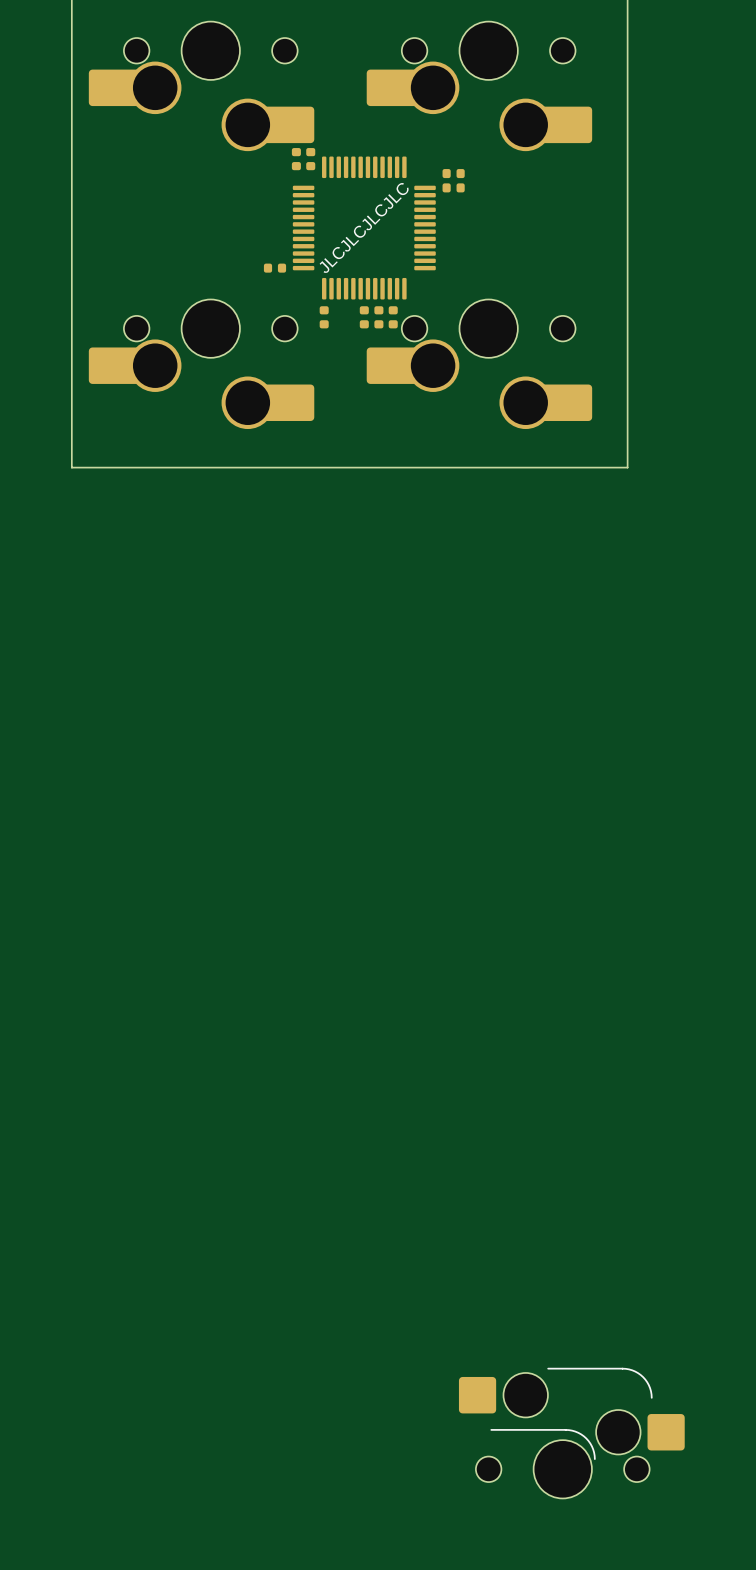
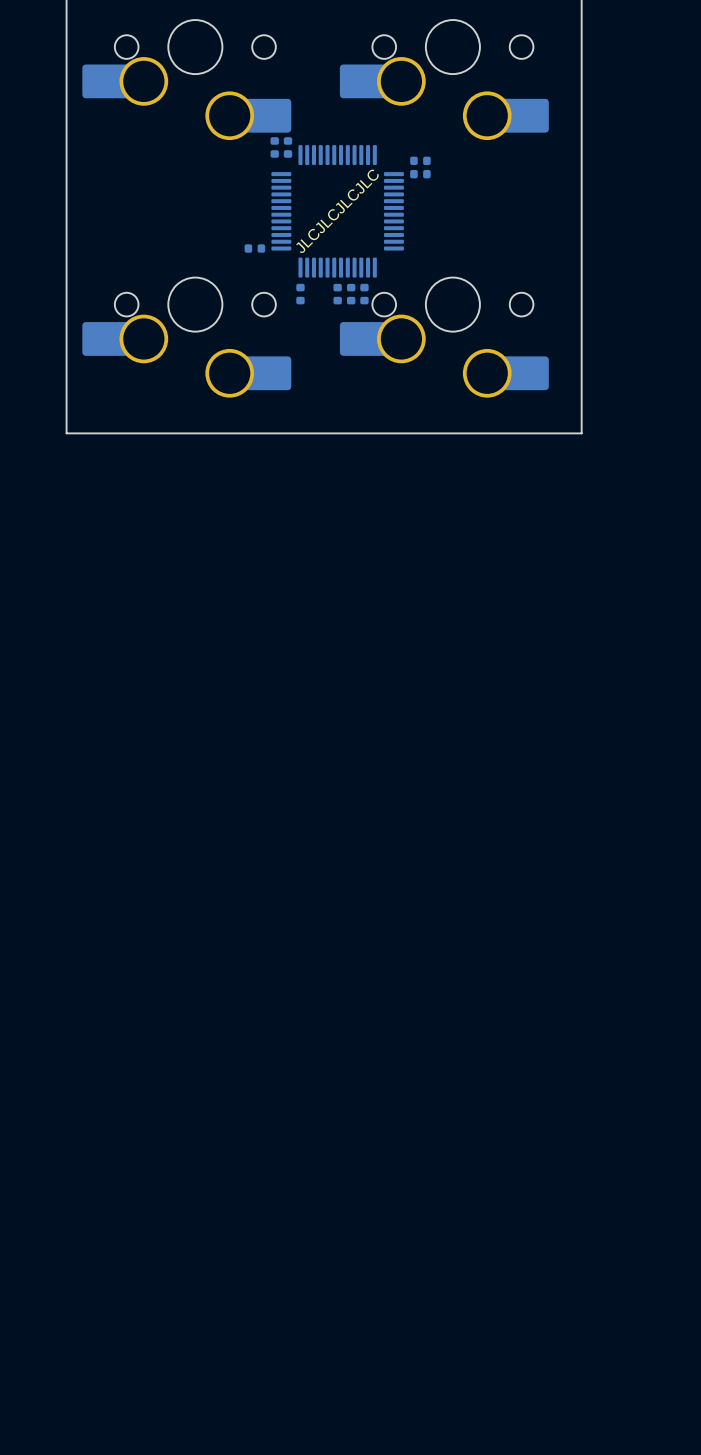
part: (571, 1433) -> none

